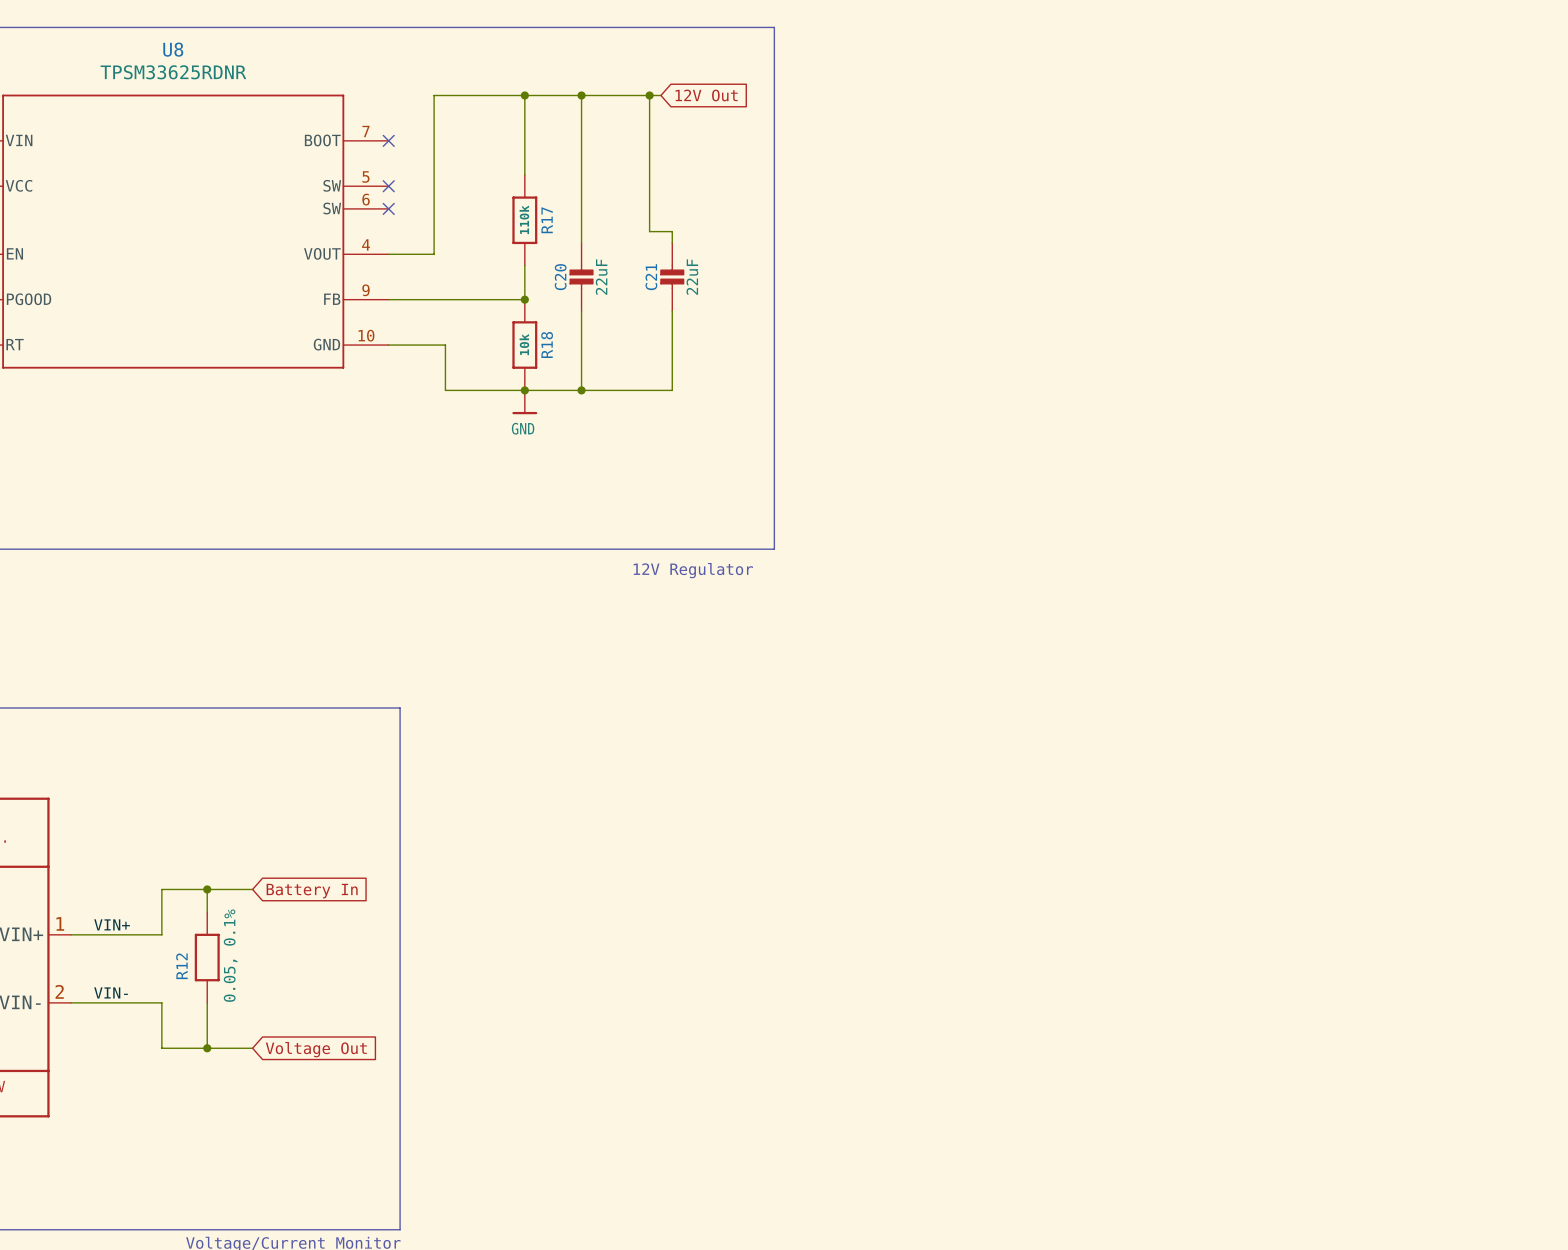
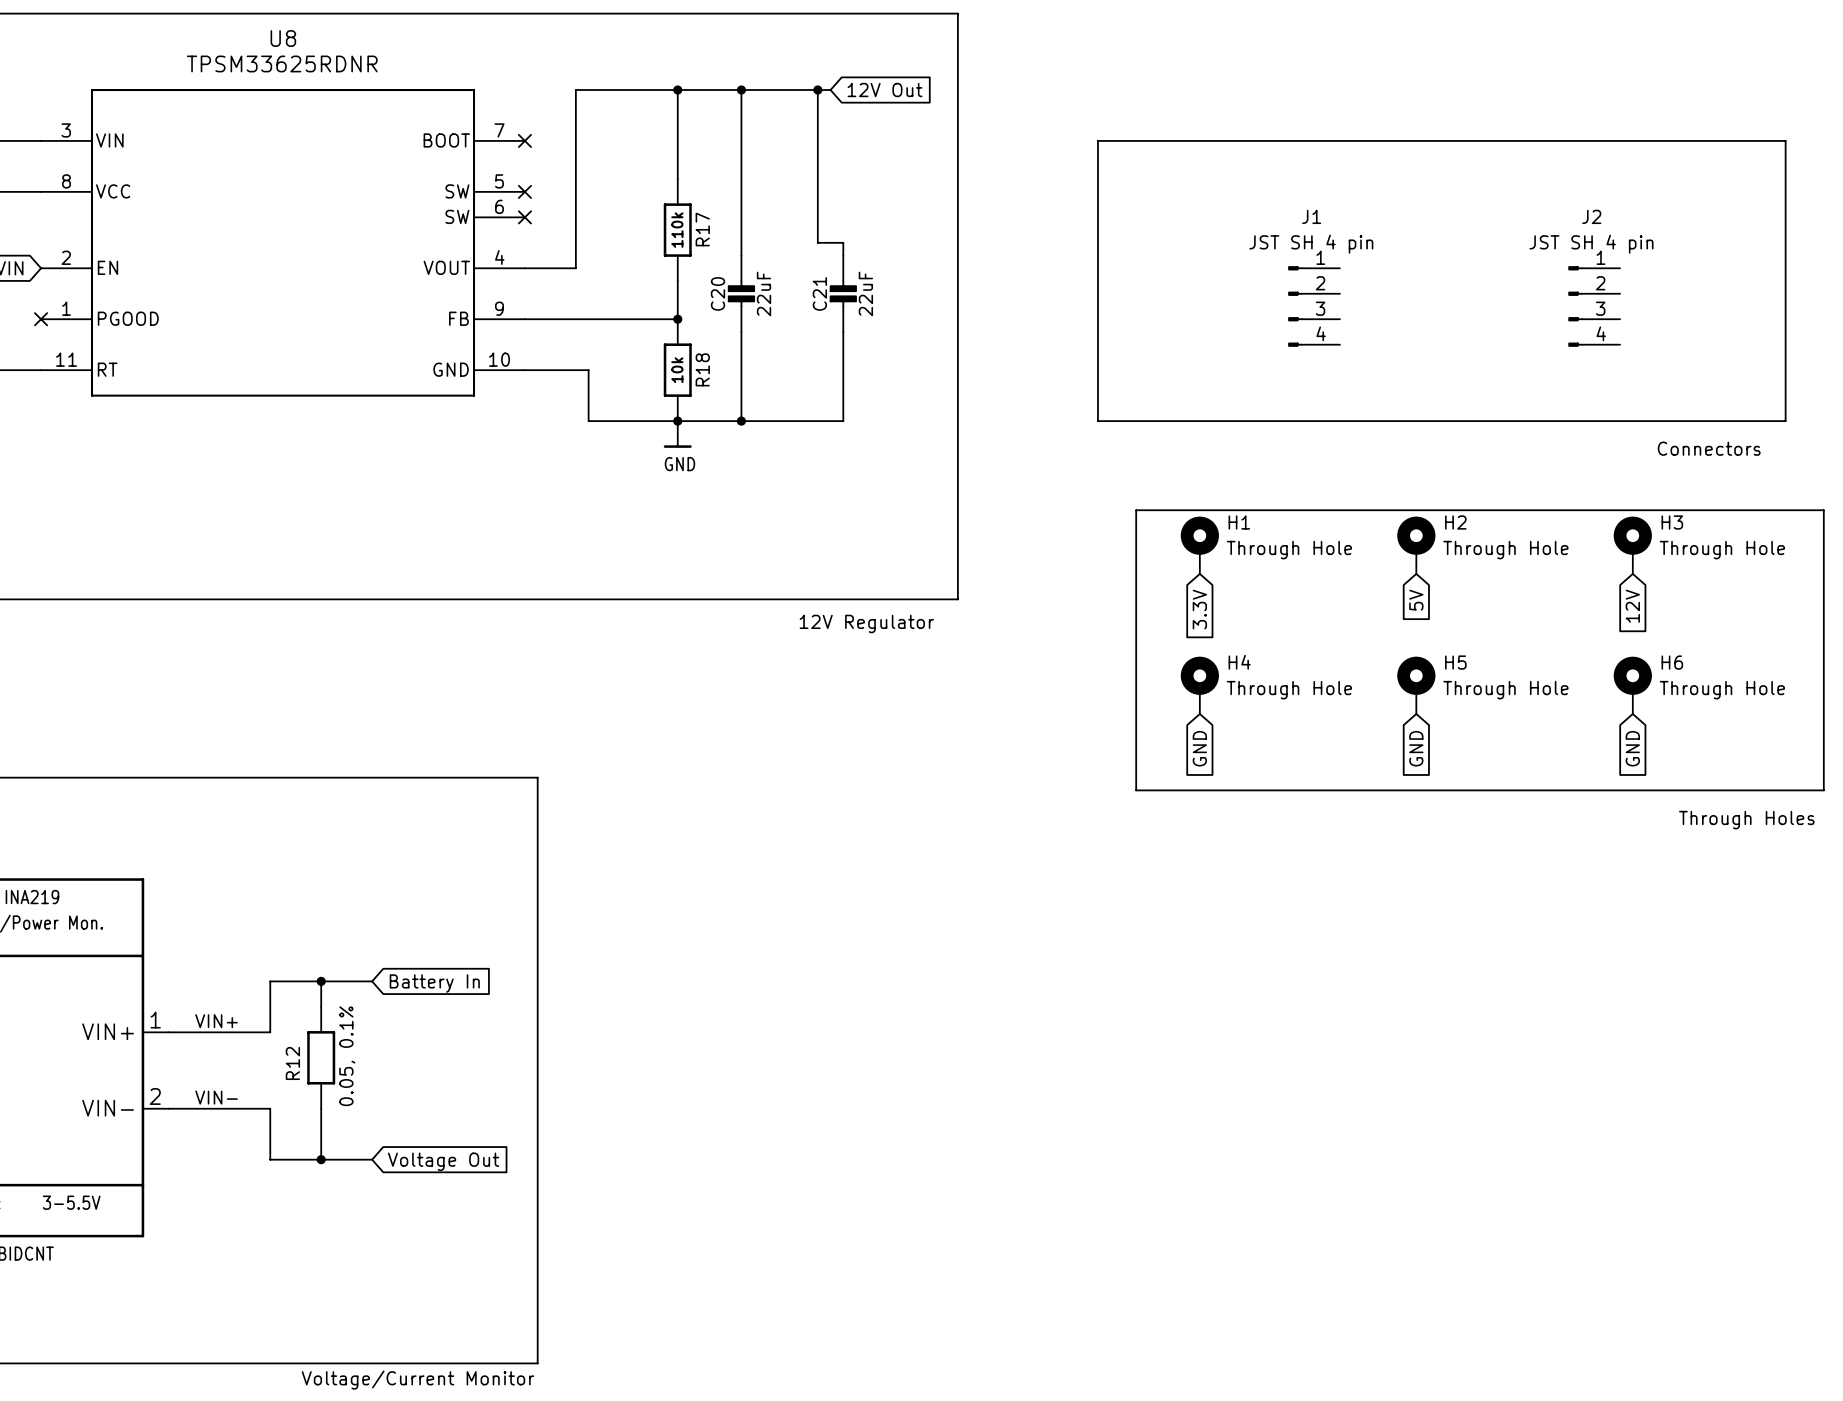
line: none -> (1097, 140) (1785, 140) (1785, 421) (1097, 421) (1097, 140)
J1: none -> JST SH 4 pin (1314, 306)
J2: none -> JST SH 4 pin (1594, 306)
text: none -> Connectors (1709, 448)
line: none -> (1136, 510) (1823, 510) (1823, 790) (1136, 790) (1136, 510)
H1: none -> Through Hole (1199, 545)
H2: none -> Through Hole (1416, 545)
H3: none -> Through Hole (1632, 545)
global label: none -> 5V (1416, 600)
global label: none -> 12V (1632, 606)
global label: none -> 3.3V (1199, 609)
H4: none -> Through Hole (1199, 685)
H5: none -> Through Hole (1416, 685)
H6: none -> Through Hole (1632, 685)
global label: none -> GND (1199, 748)
global label: none -> GND (1416, 748)
global label: none -> GND (1632, 748)
text: none -> Through Holes (1746, 820)

